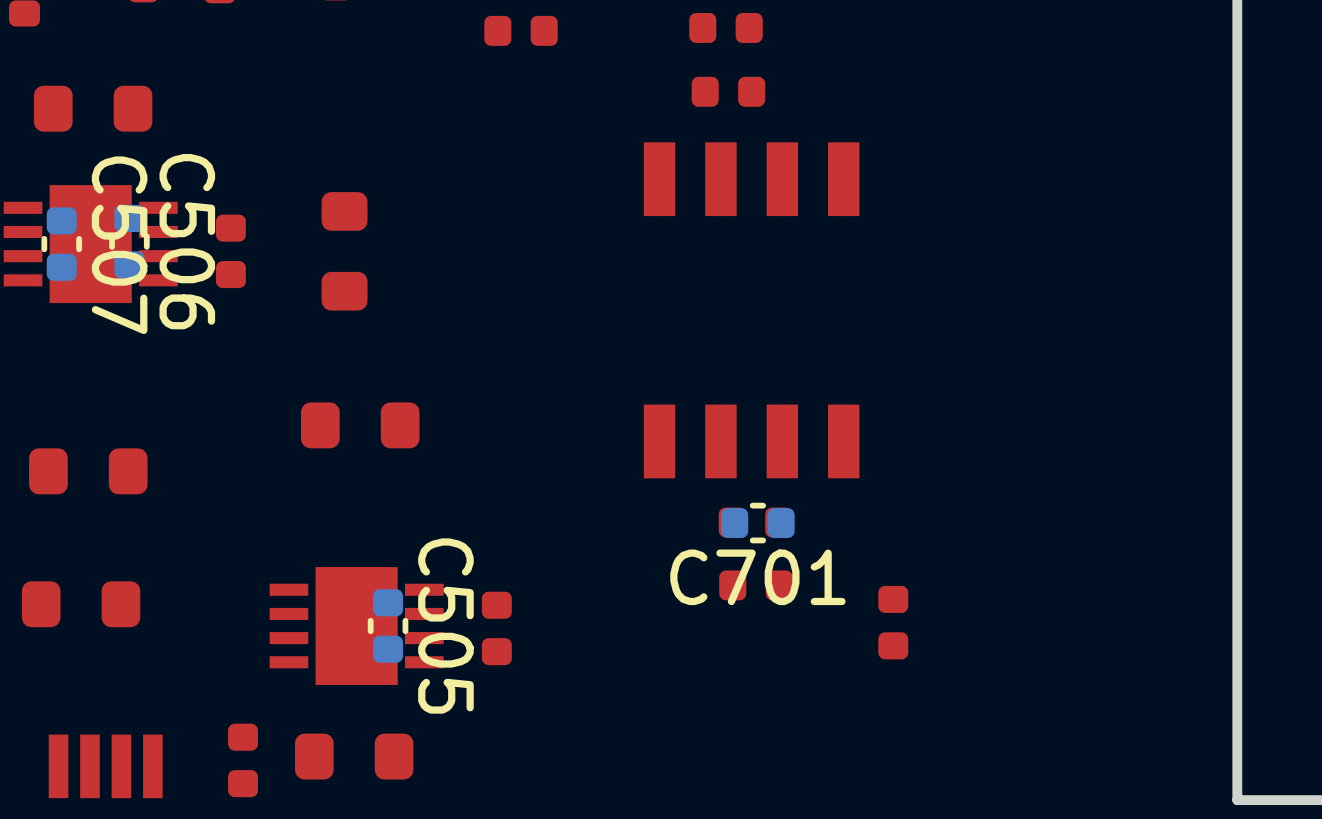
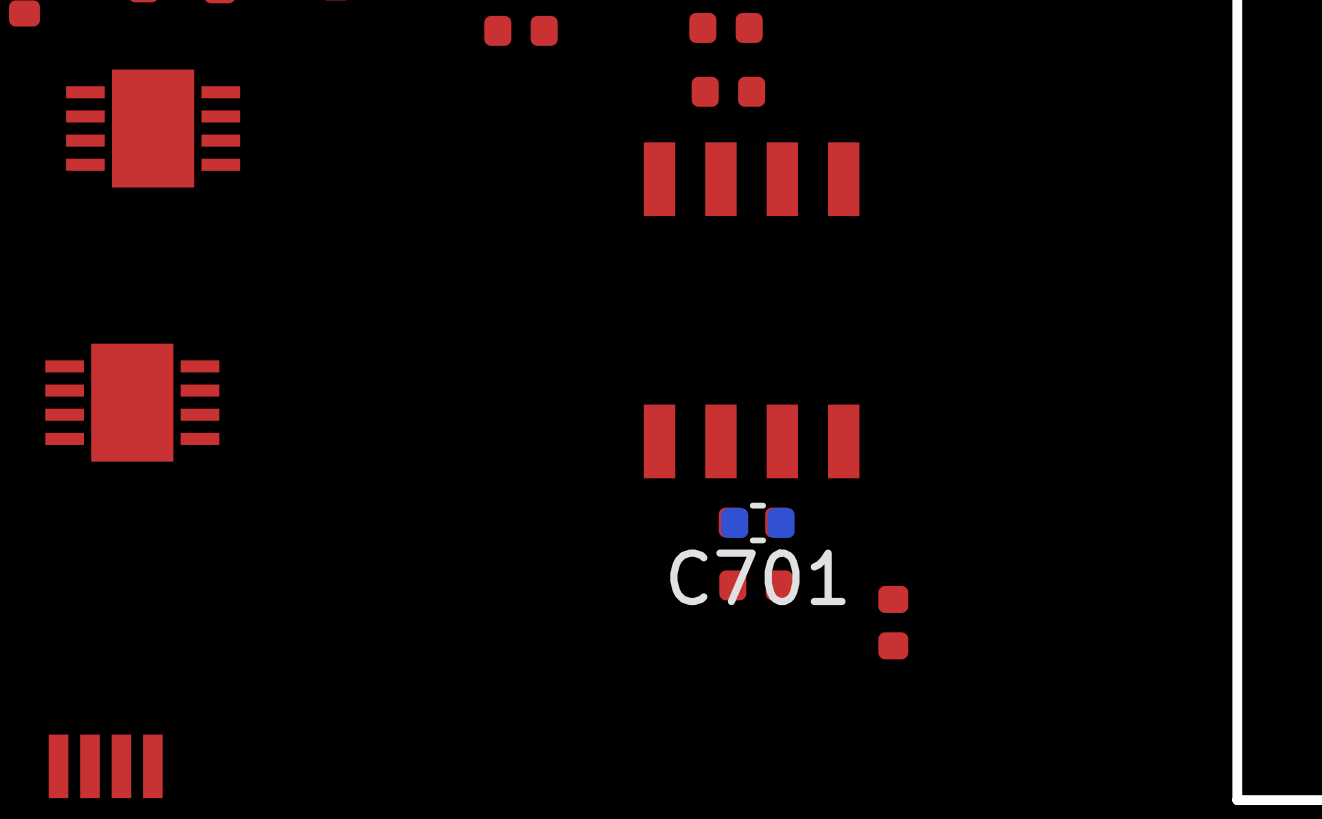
part: (93, 108) -> none
part: none -> (153, 128)
C506: (129, 241) -> none
C507: (61, 244) -> none
part: (90, 244) -> none
part: (230, 251) -> none
part: (344, 251) -> none
part: none -> (132, 402)
part: (360, 425) -> none
part: (88, 471) -> none
part: (81, 604) -> none
part: (356, 626) -> none
C505: (388, 626) -> none
part: (496, 628) -> none
part: (354, 756) -> none
part: (243, 760) -> none

